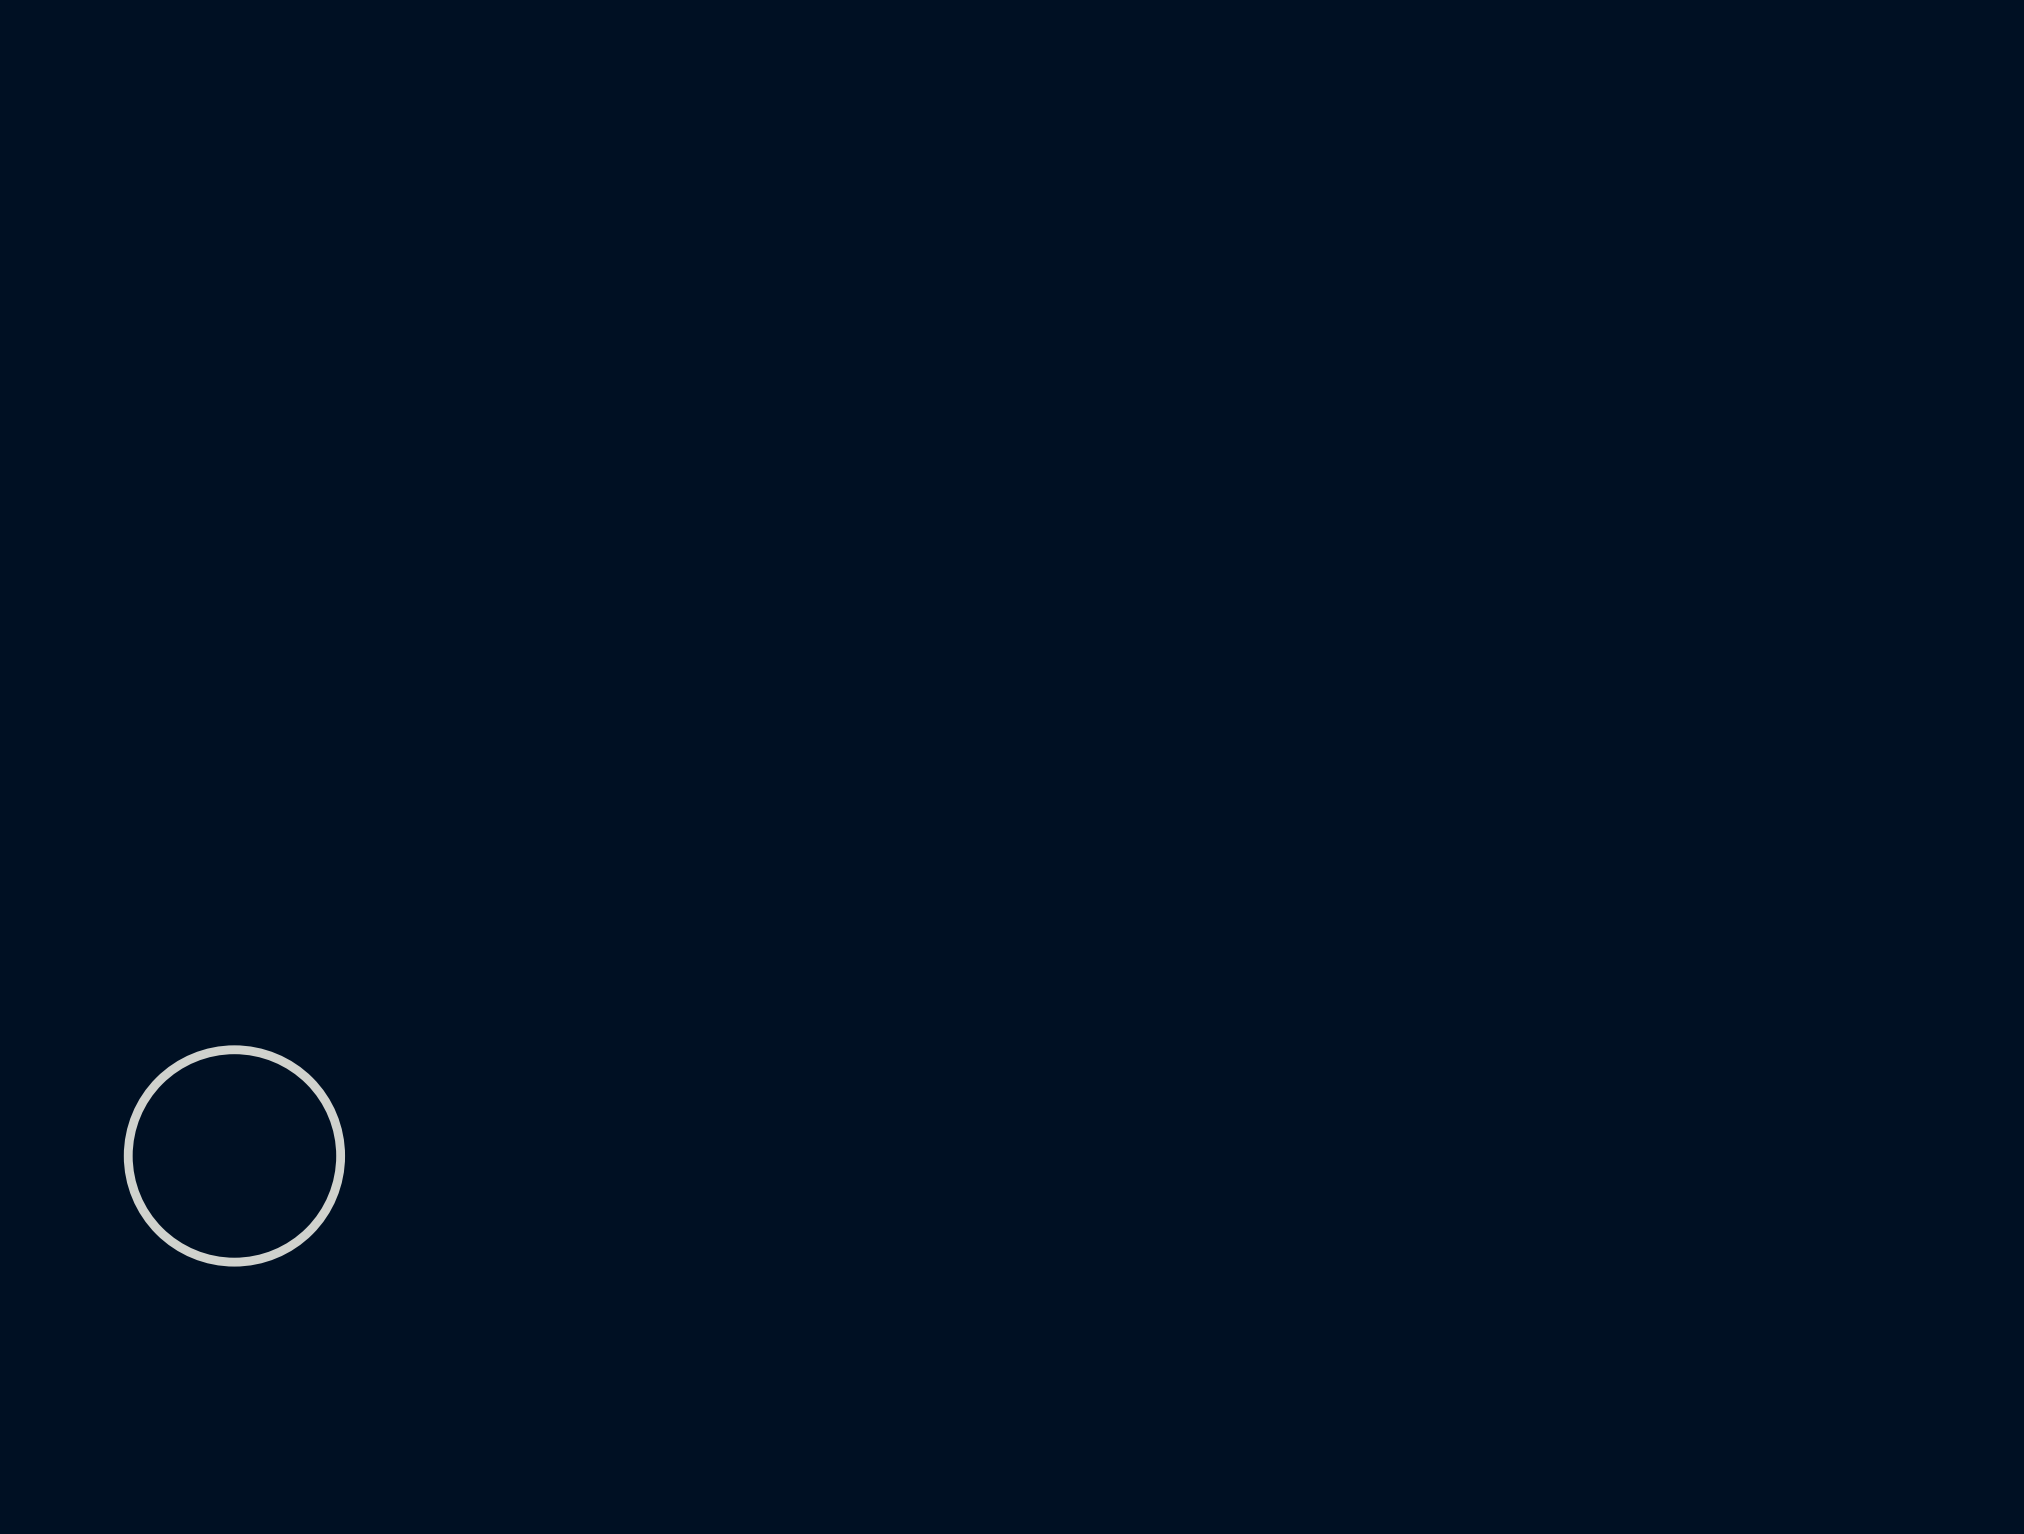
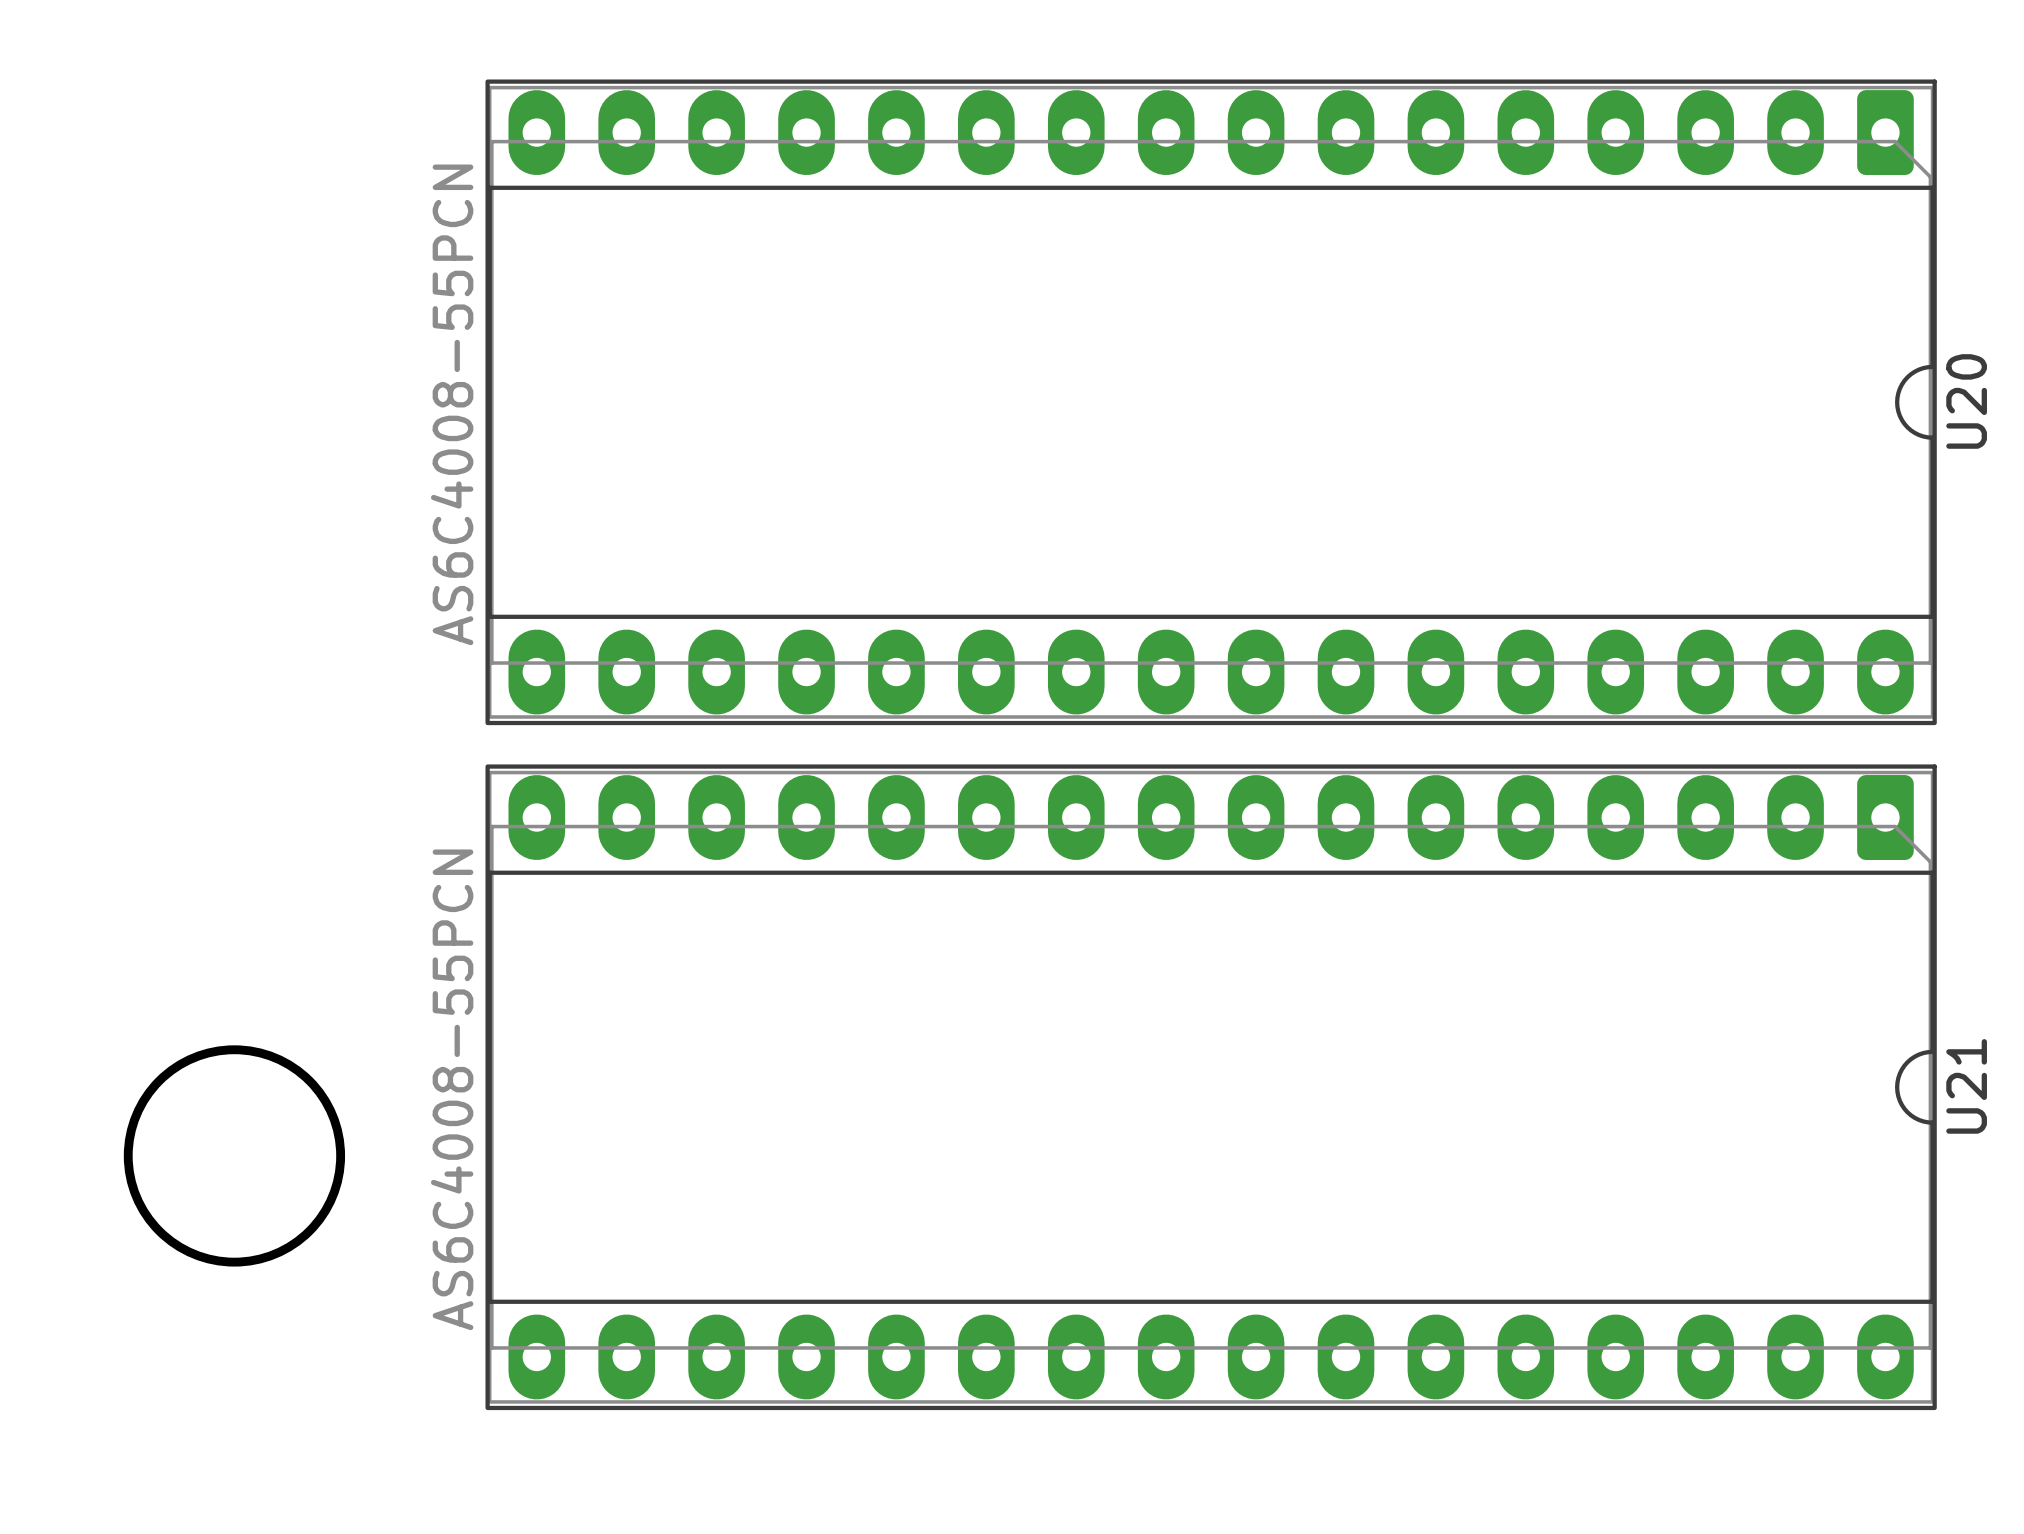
U20: none -> AS6C4008-55PCN (1211, 402)
U21: none -> AS6C4008-55PCN (1211, 1087)

